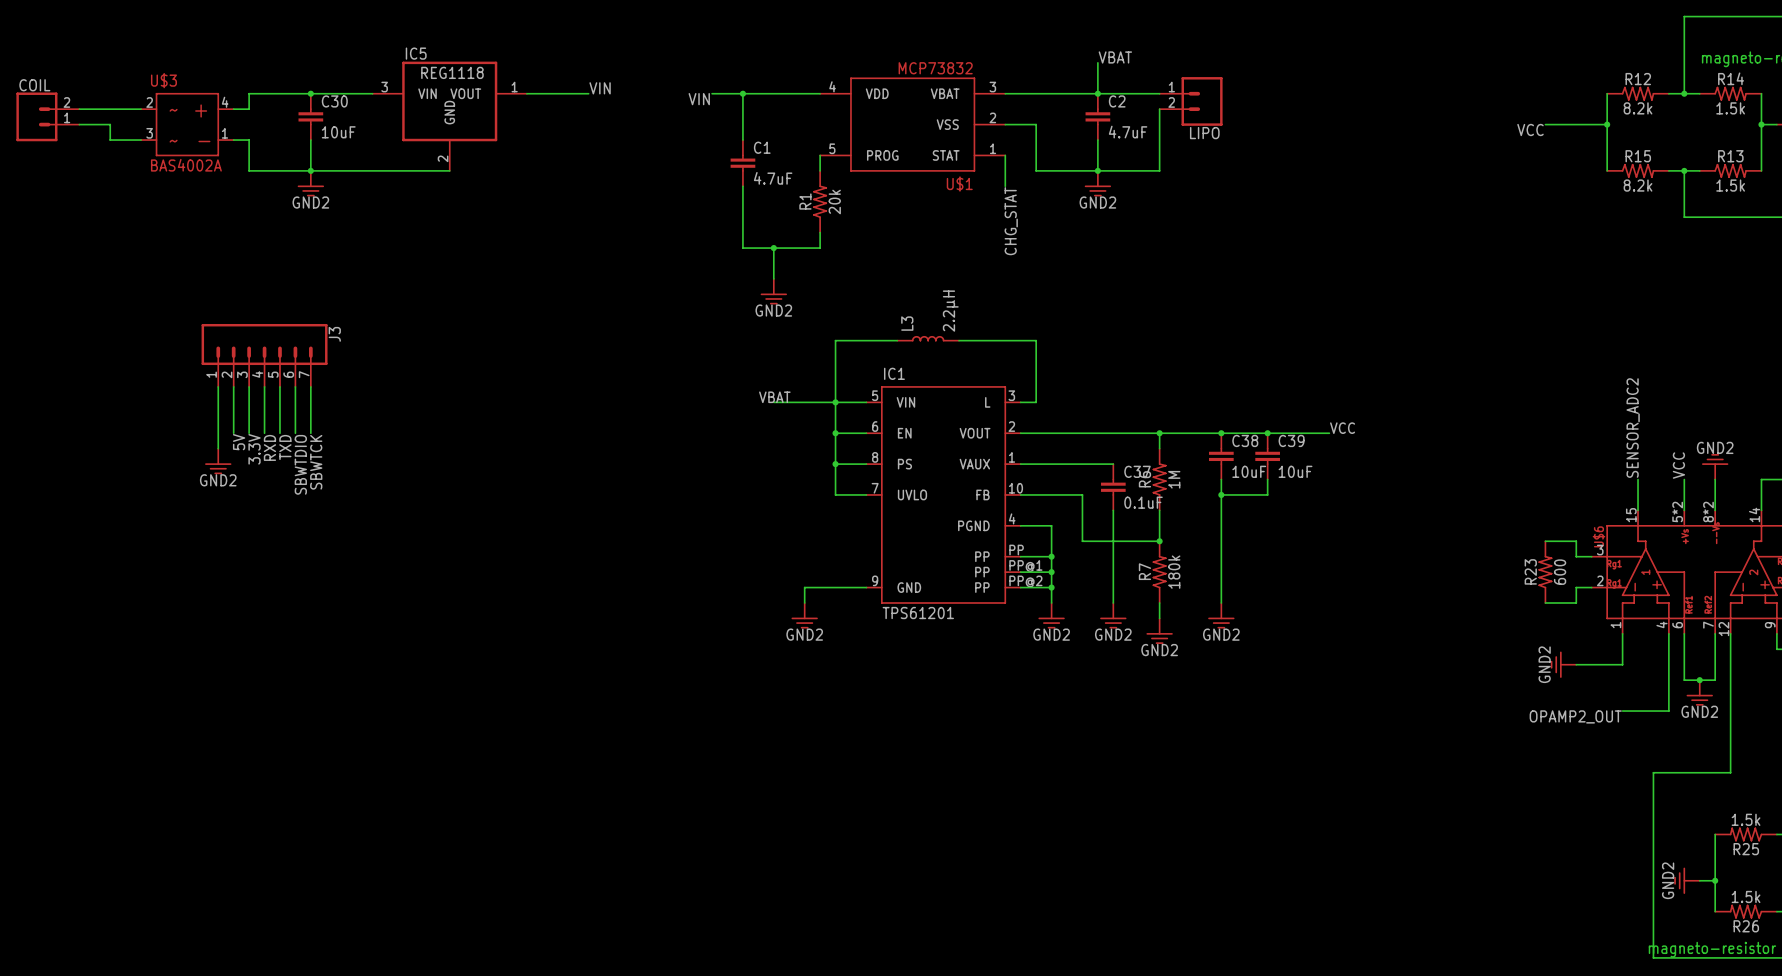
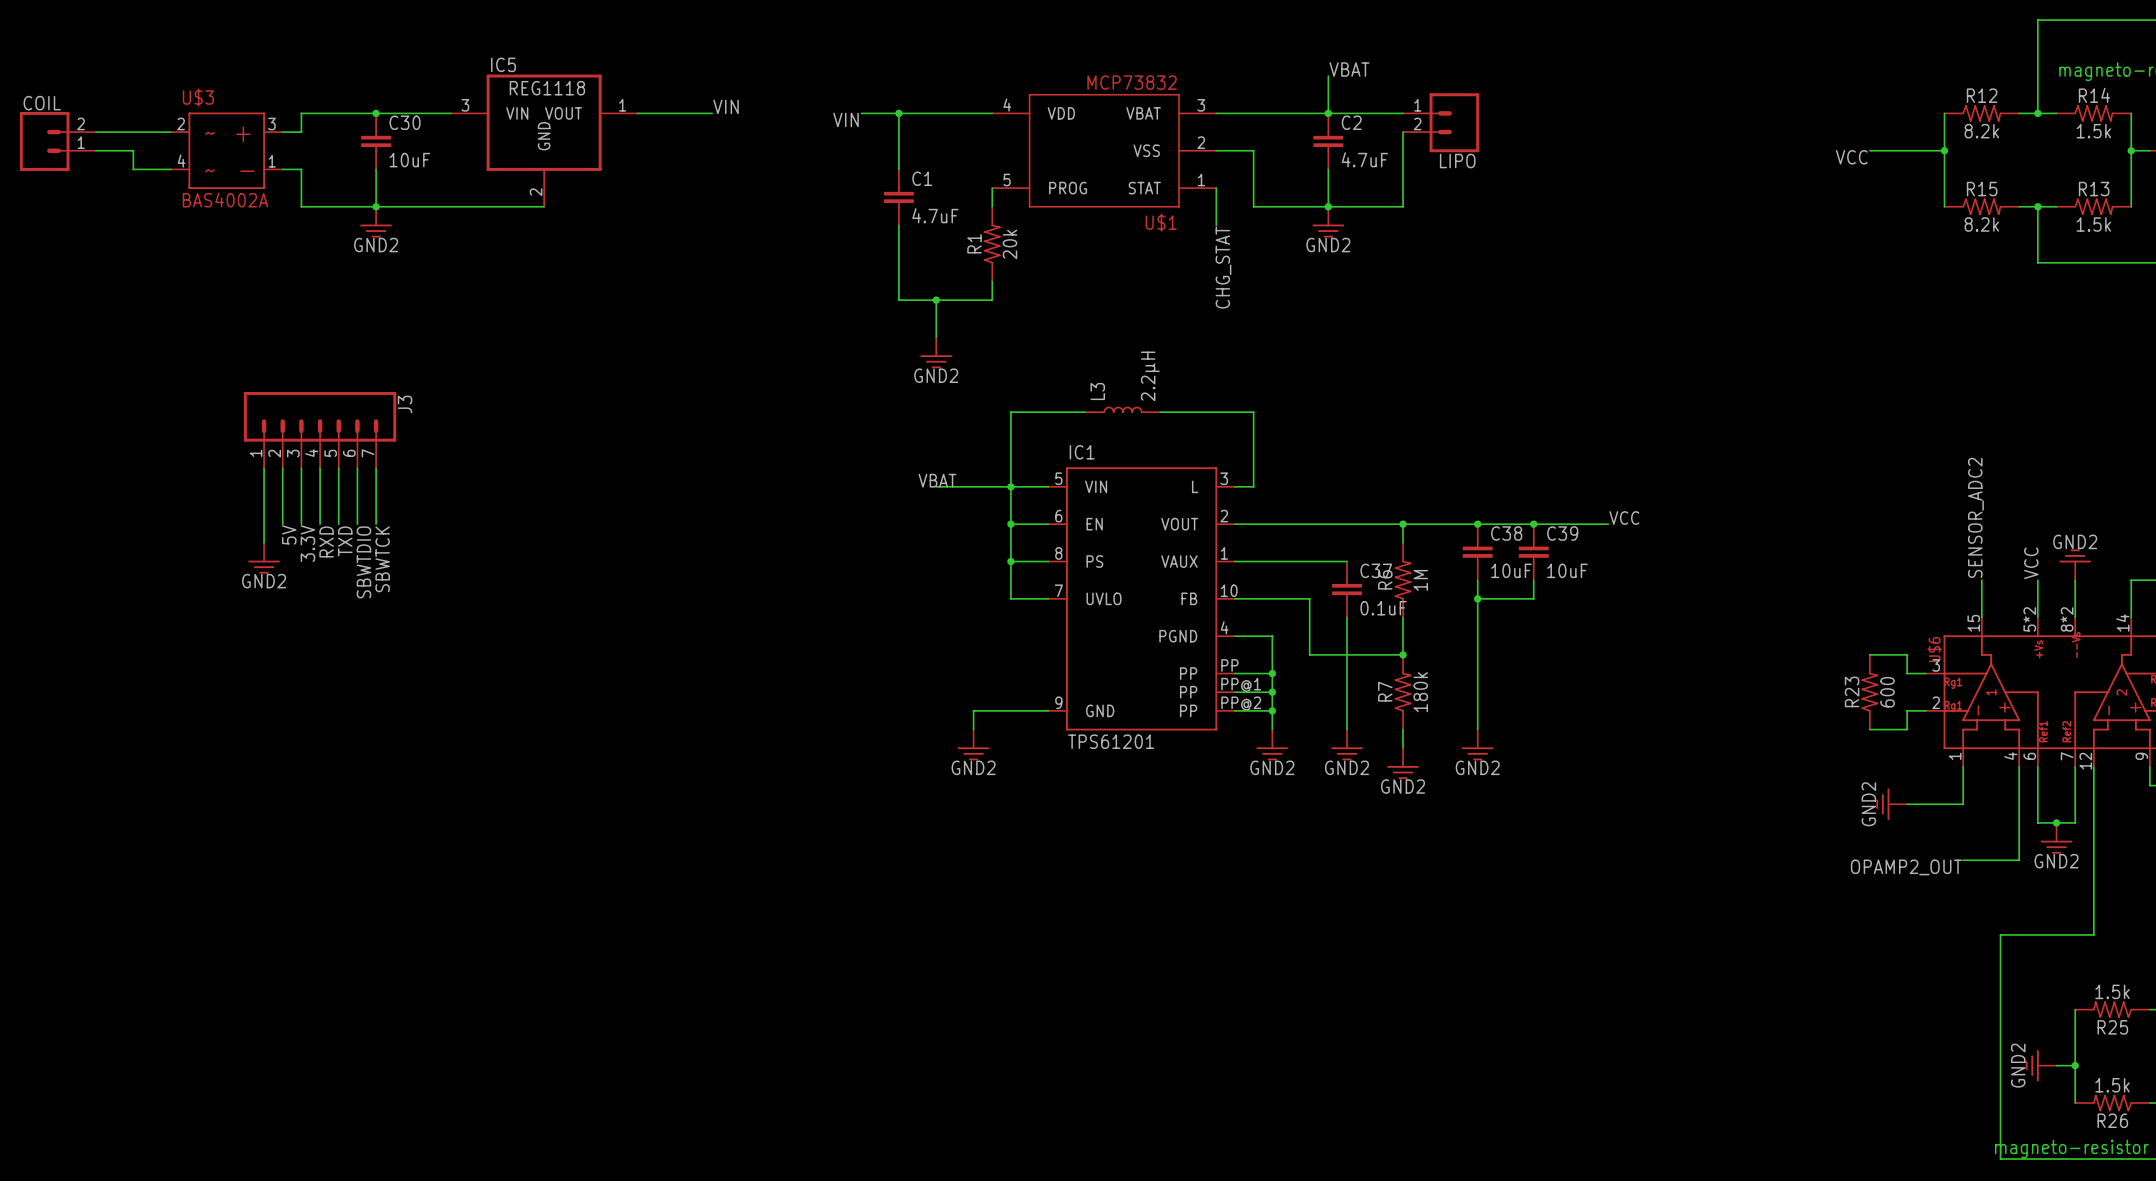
U$3 pin number: 4 (225, 102) -> 3 (271, 123)
U$3 pin number: 3 (149, 133) -> 4 (181, 161)

